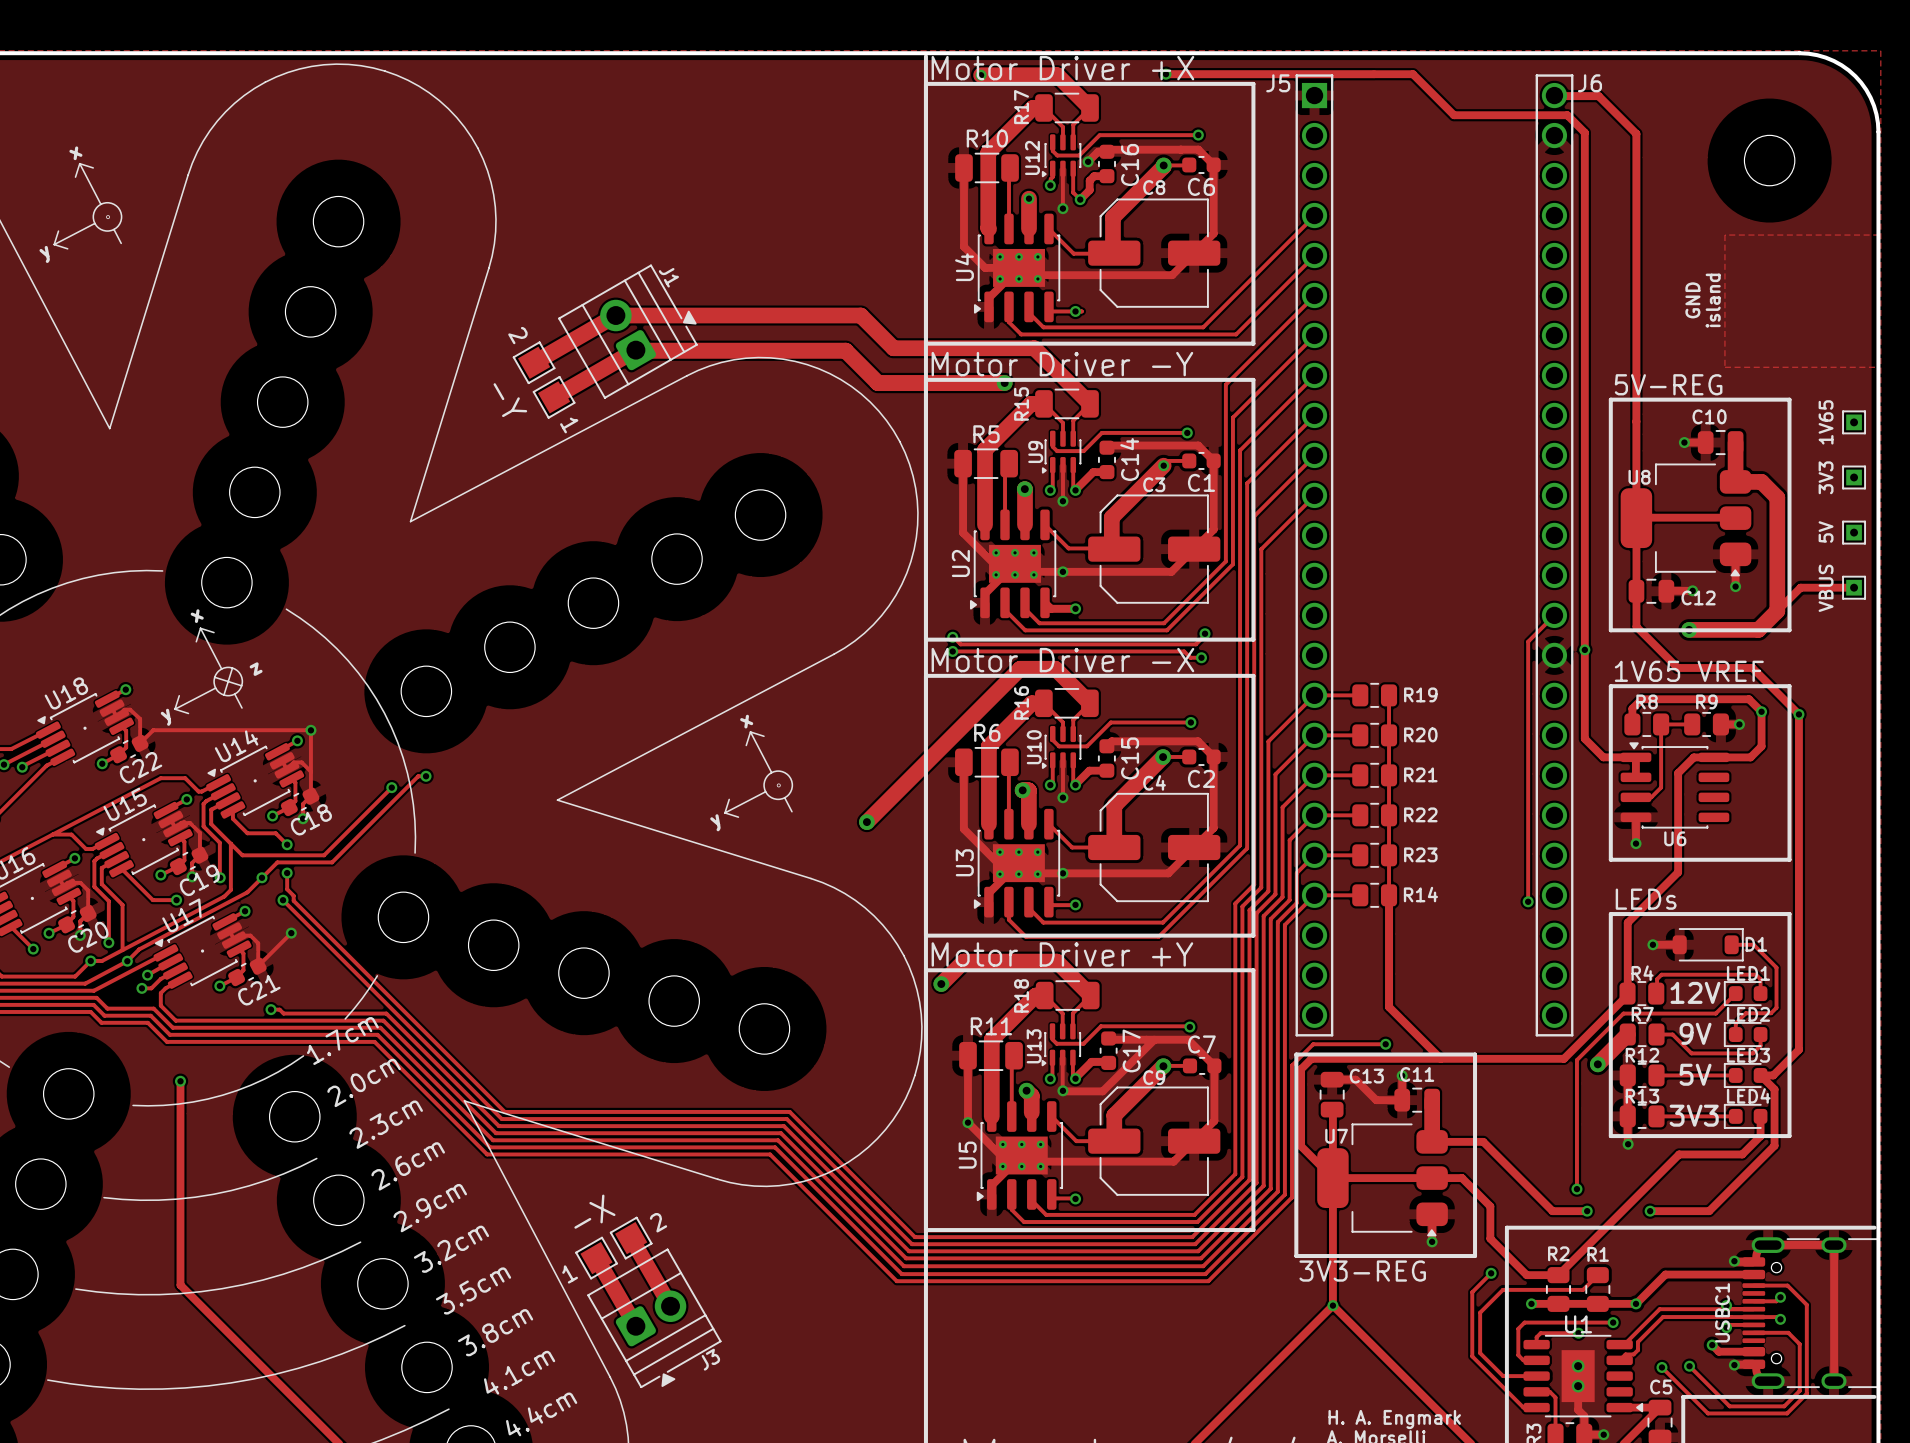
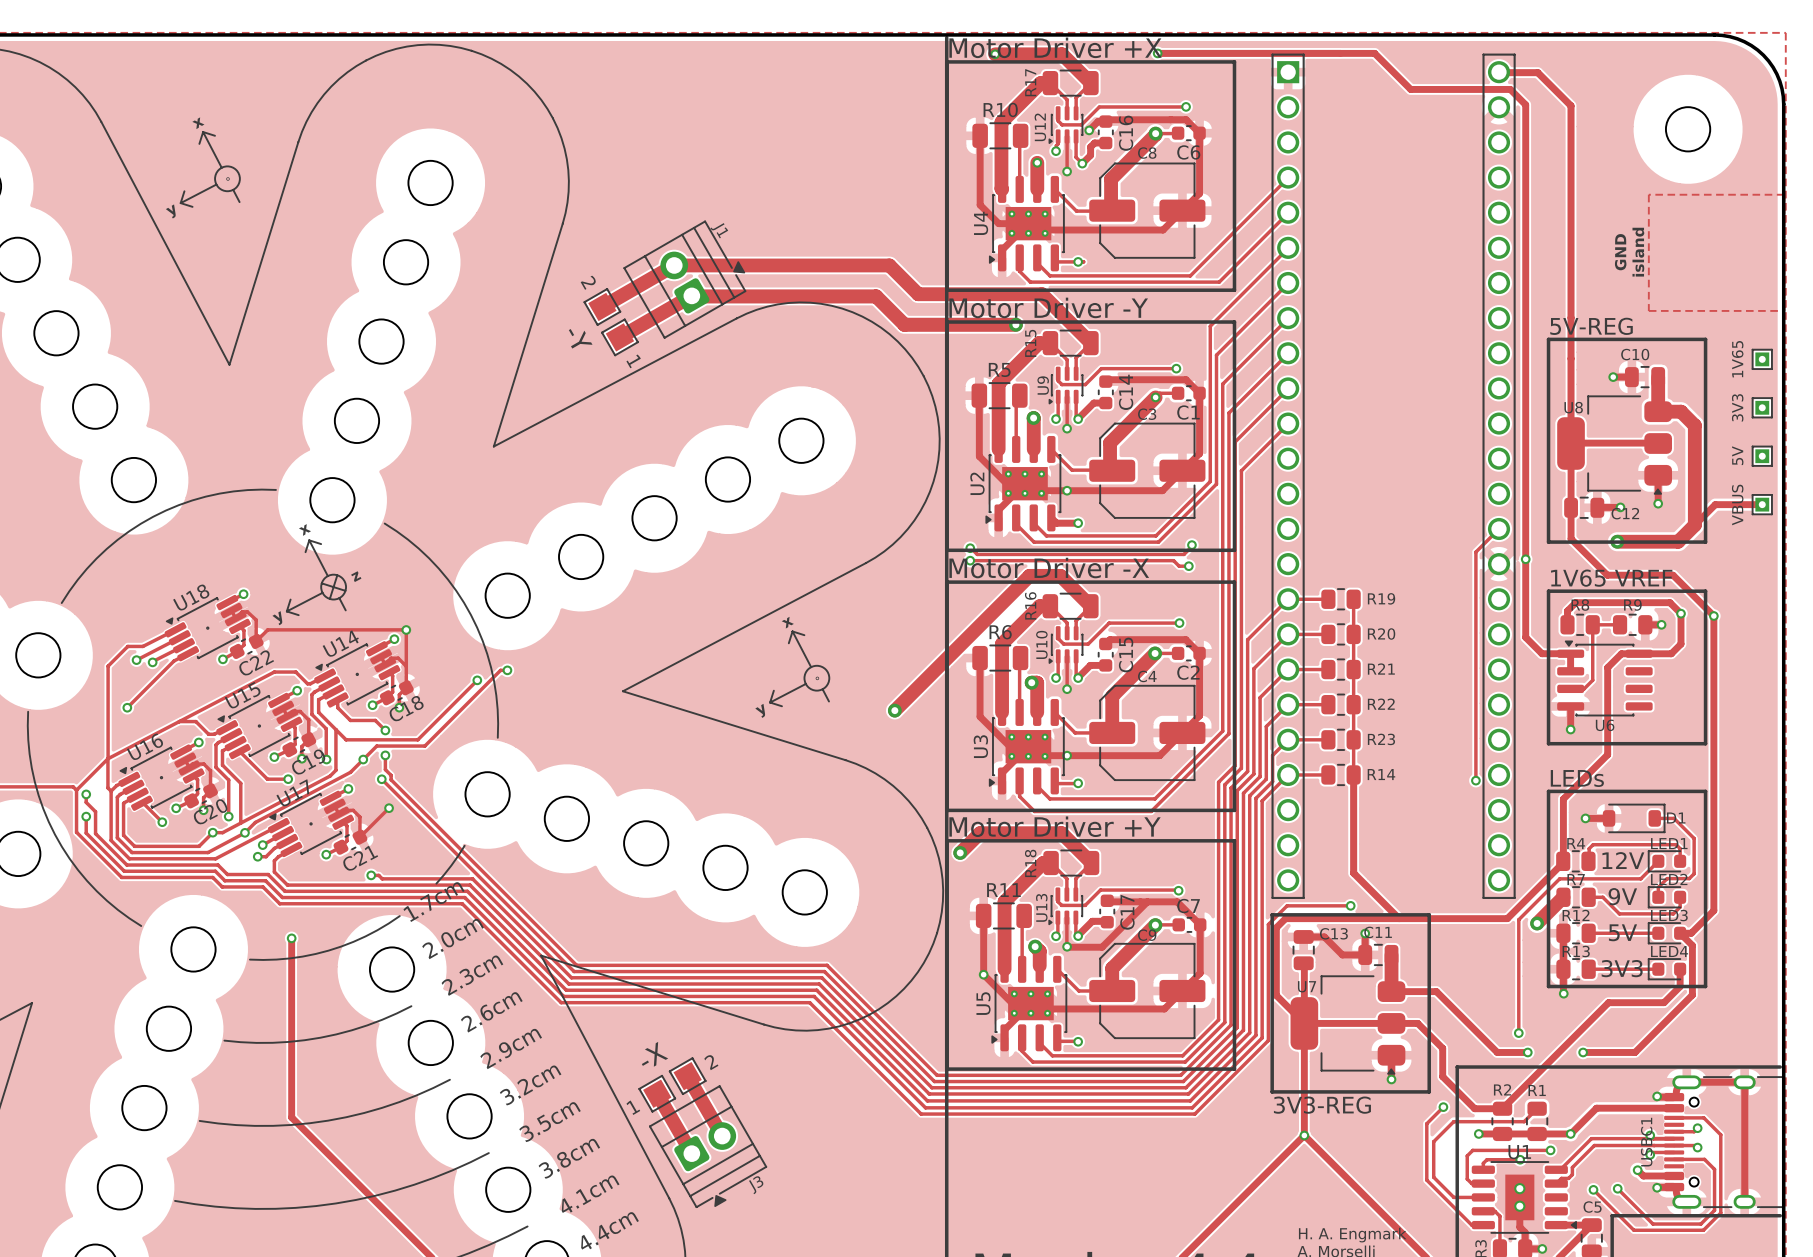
J5: (1278, 83) -> none
J6: (1589, 83) -> none

